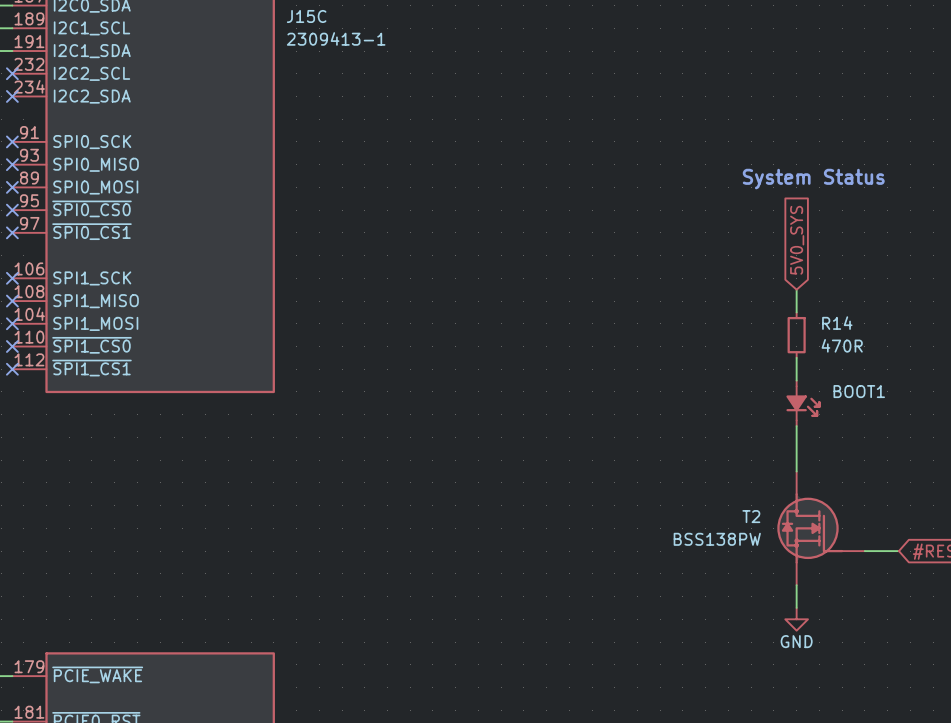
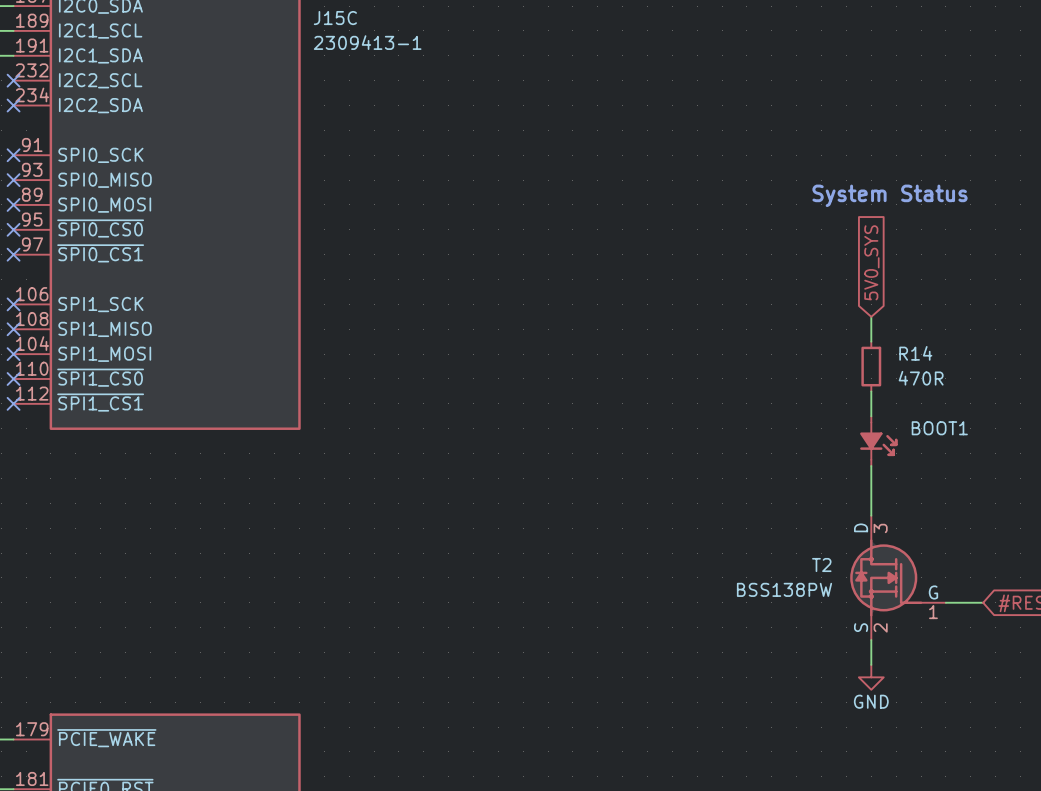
T2 pin name: none -> D (861, 527)
T2 pin number: none -> 3 (880, 528)
T2 pin name: none -> G (933, 592)
T2 pin number: none -> 1 (933, 612)
T2 pin name: none -> S (861, 627)
T2 pin number: none -> 2 (880, 627)

